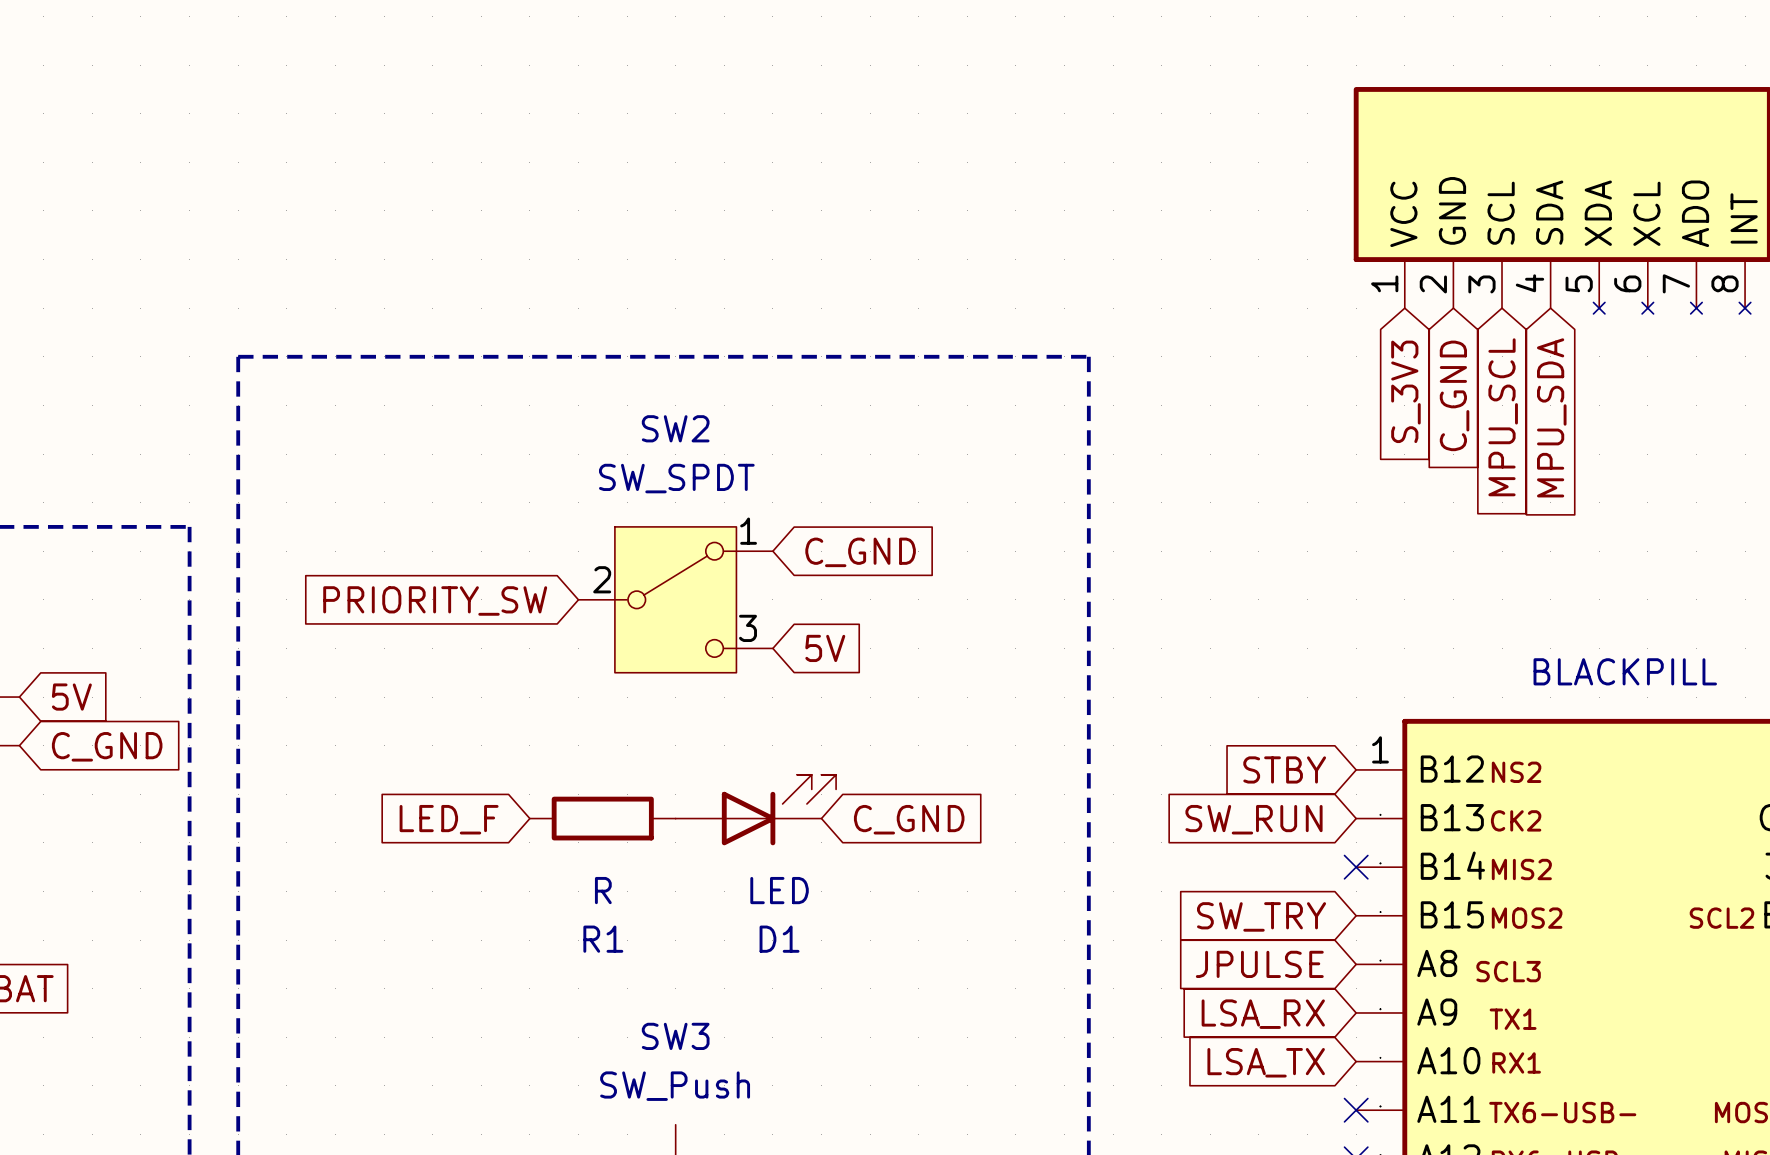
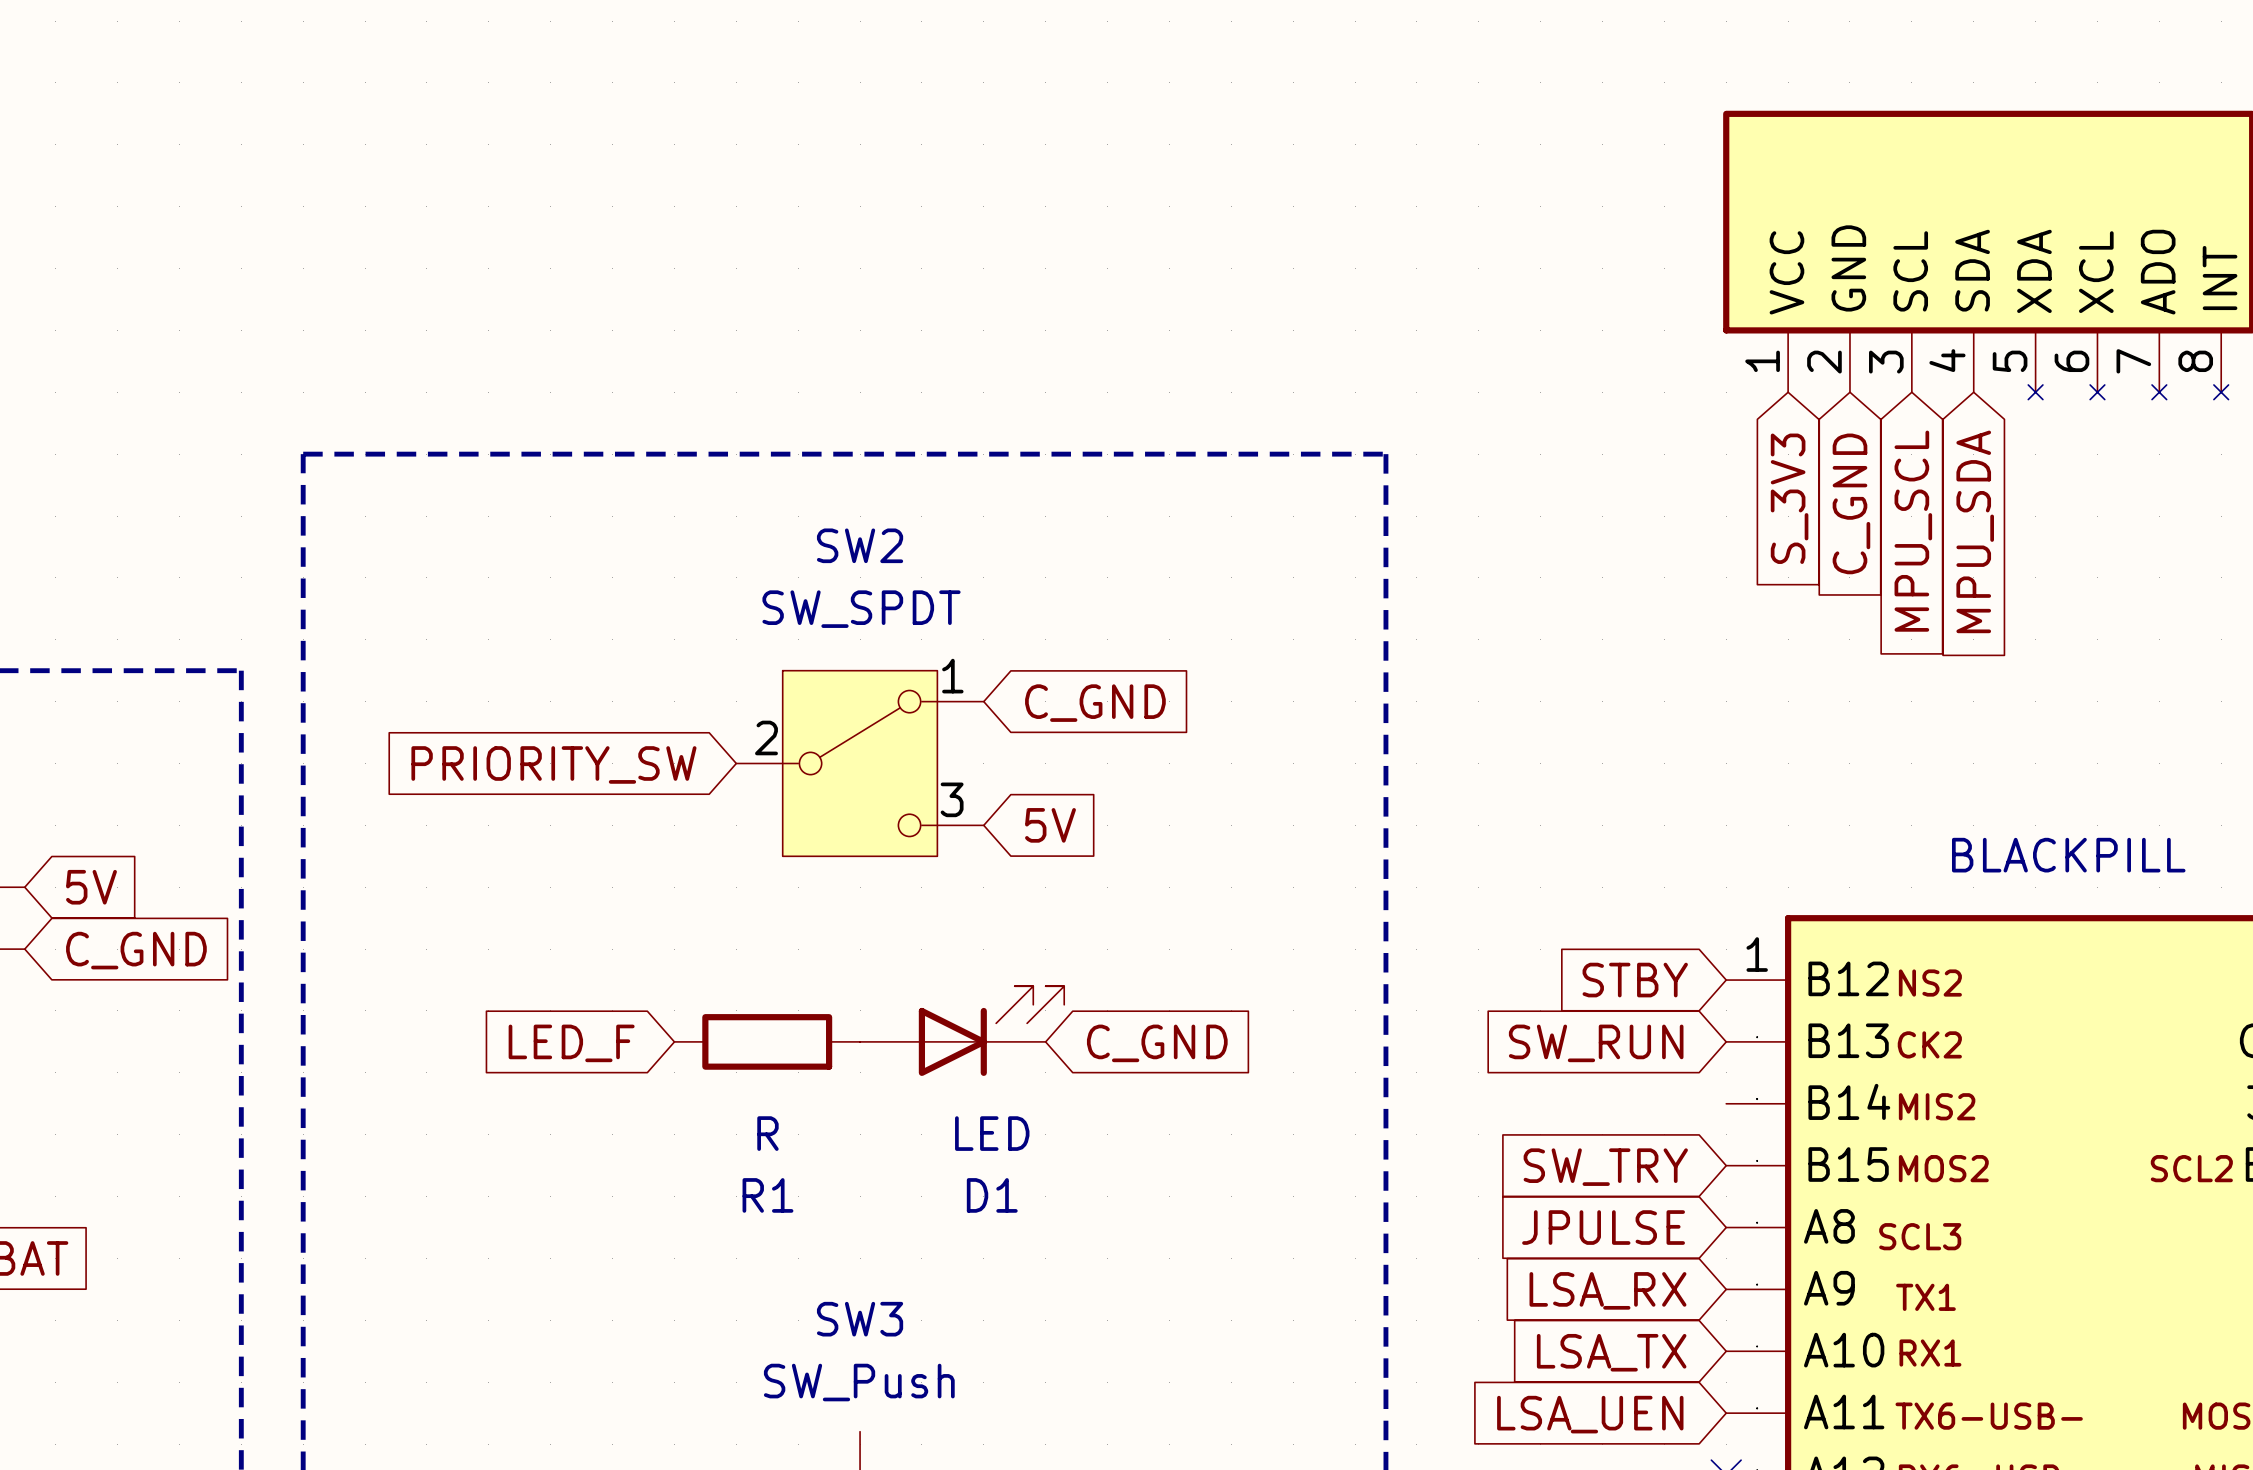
no-connect mark: (1356, 867) -> none
no-connect mark: (1356, 1110) -> none
global label: none -> LSA_UEN (1590, 1414)

